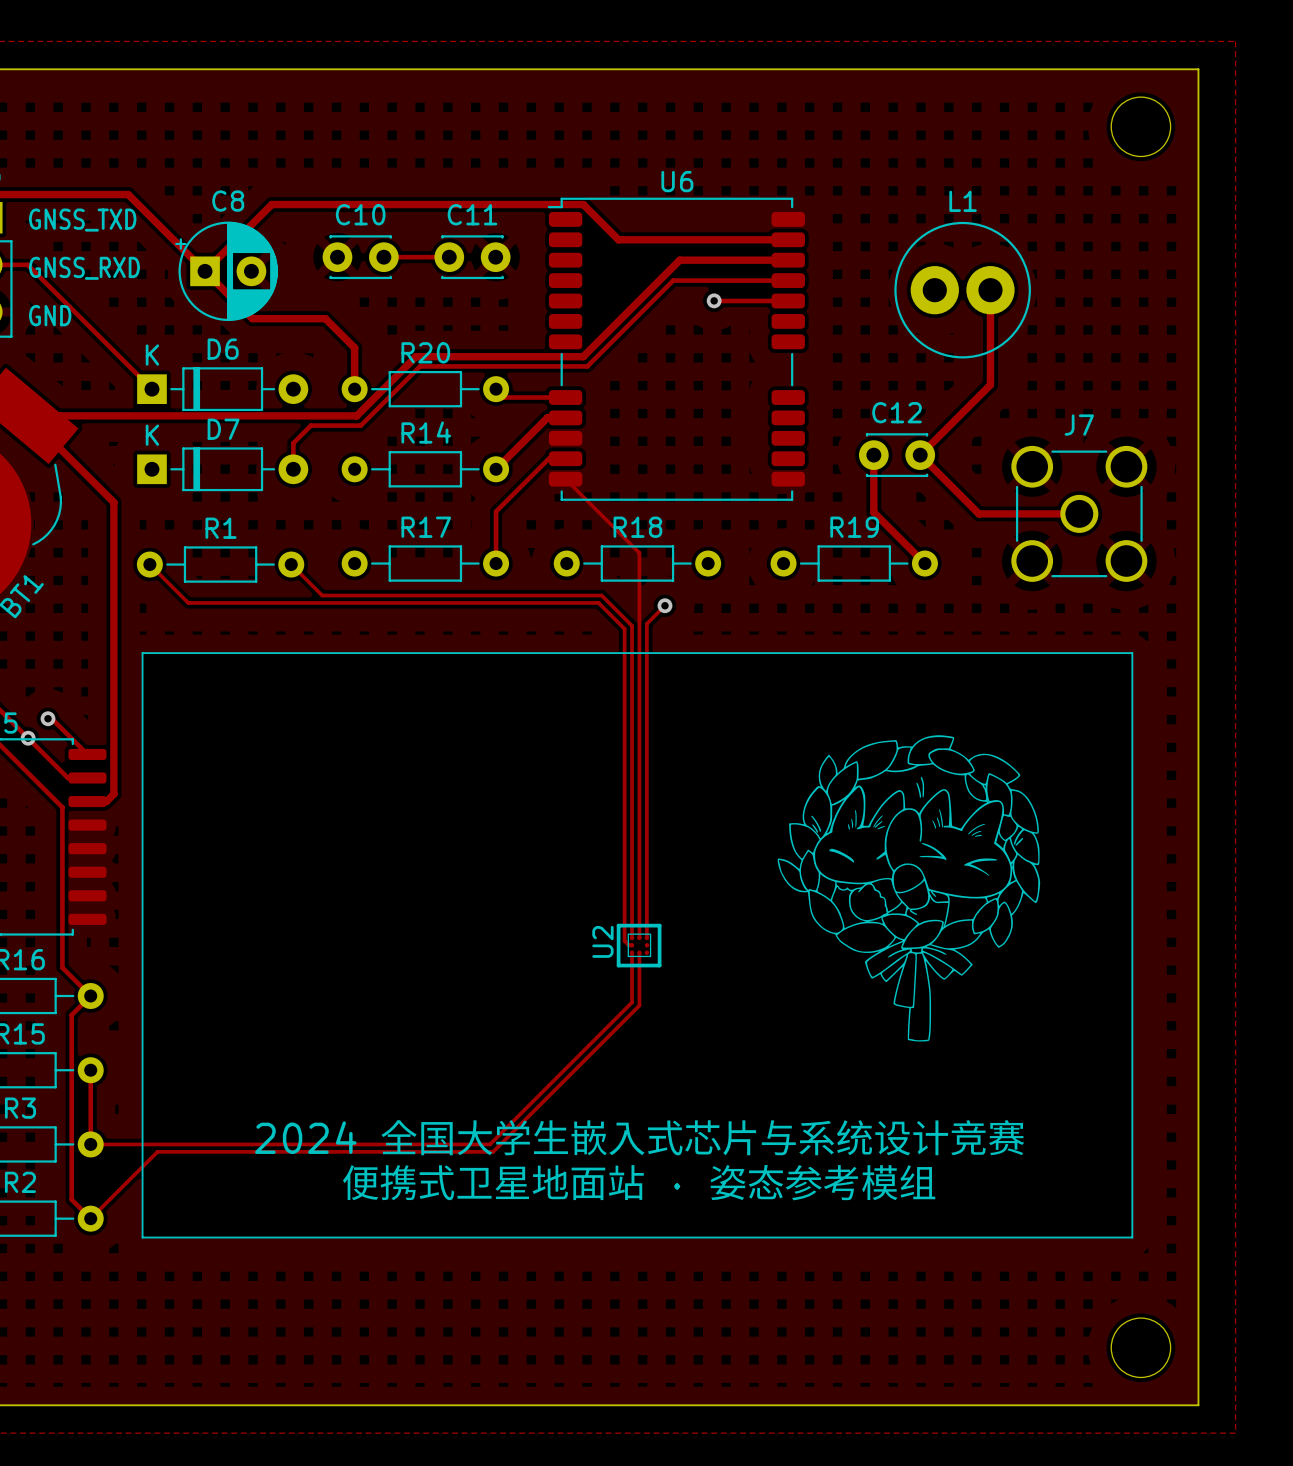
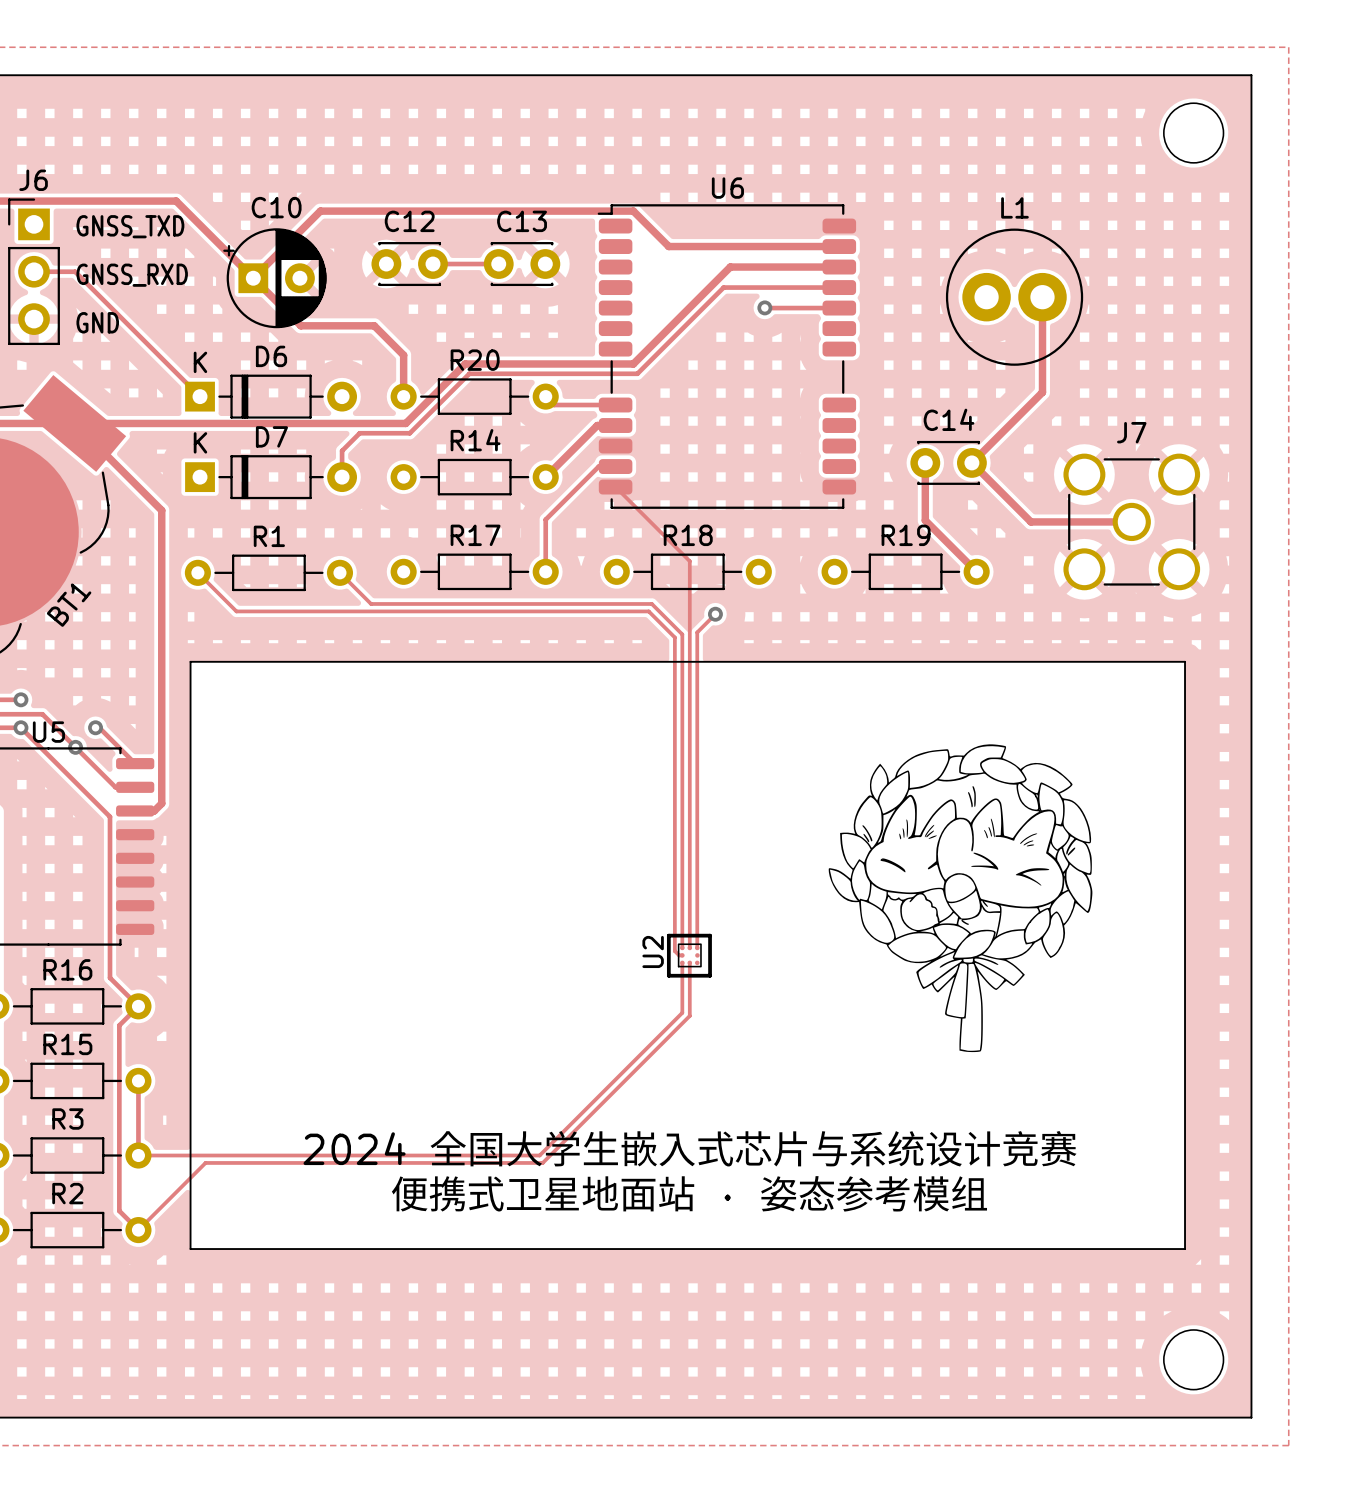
C8 name: C8 (228, 201) -> C10 (276, 207)
C10 name: C10 (360, 214) -> C12 (409, 221)
C11 name: C11 (472, 214) -> C13 (522, 221)
C12 name: C12 (897, 412) -> C14 (949, 419)

